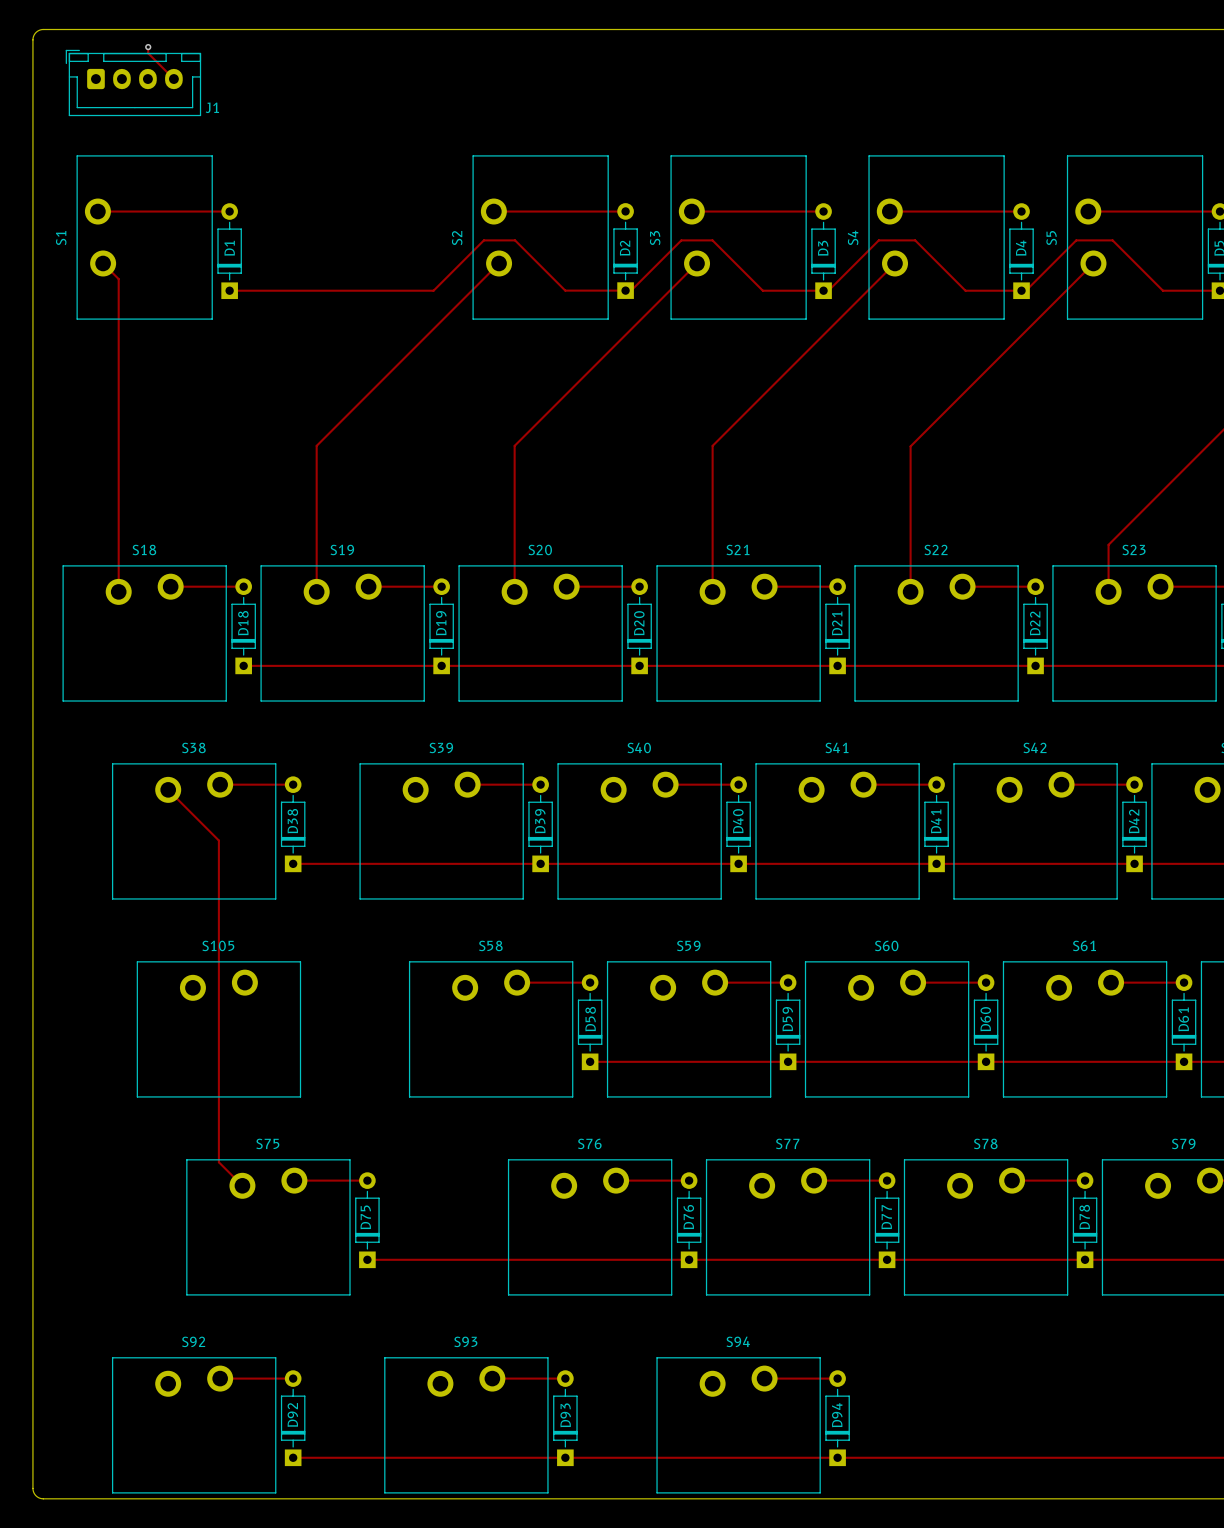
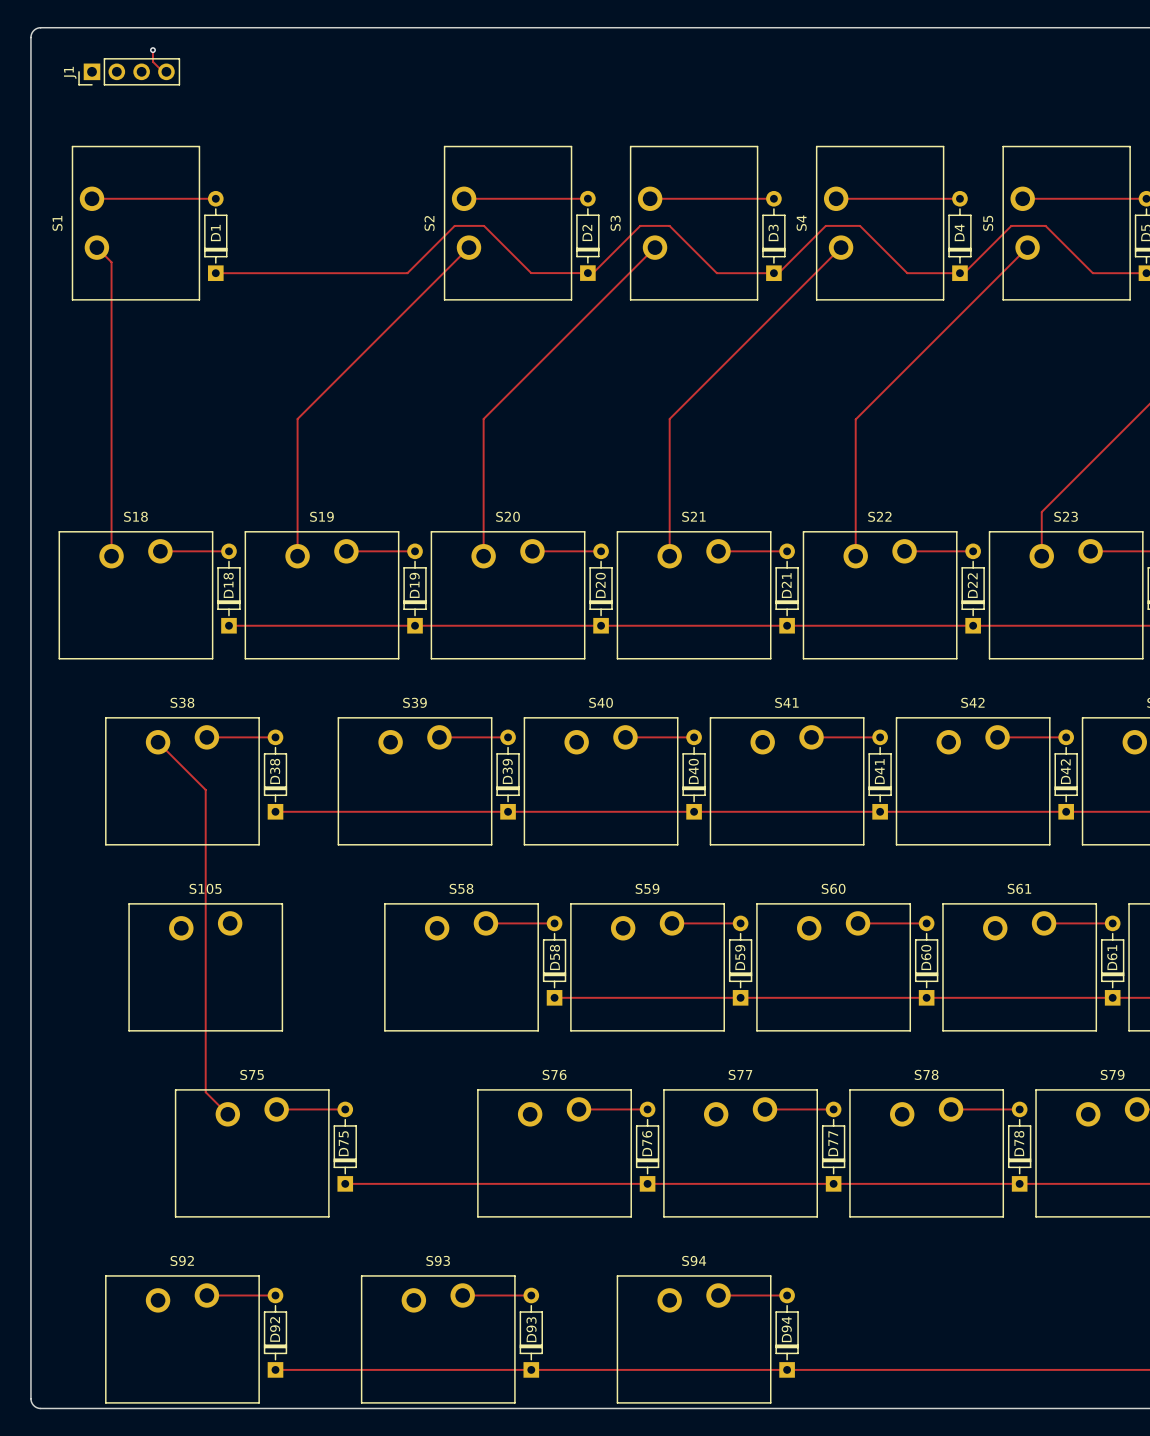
track: (148, 47) (148, 53) (173, 79) -> none
via position: (148, 47) -> (152, 50)
J1 footprint: [65, 49, 202, 117] -> [78, 58, 181, 86]
track: none -> (152, 50) (152, 61) (162, 71) (166, 71)
J1 name position: J1 (212, 107) -> J1 (70, 72)

